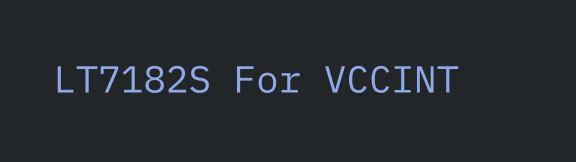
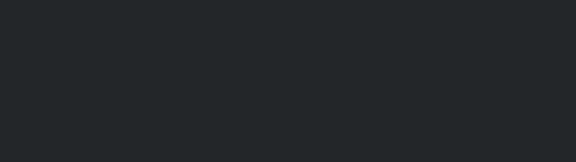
text: LT7182S For VCCINT (257, 79) -> none

